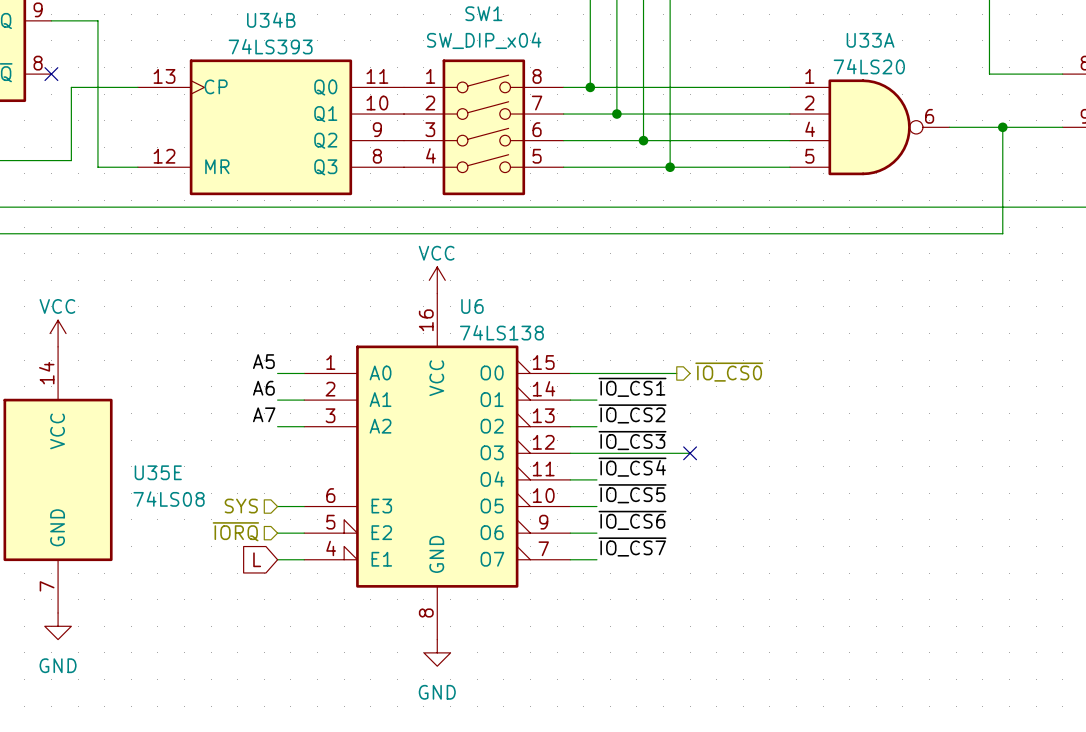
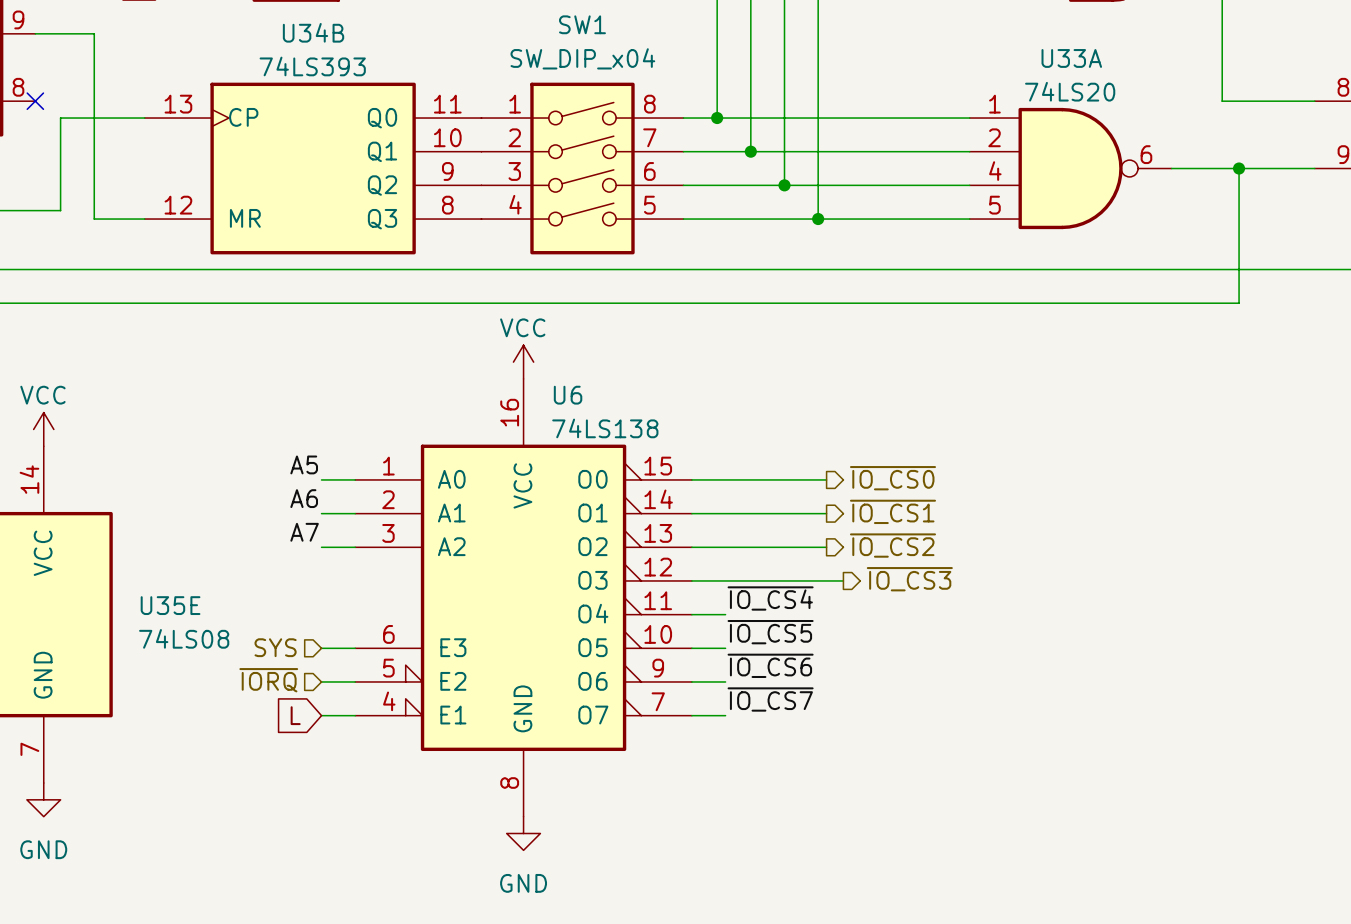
label: ~{IO_CS1} (632, 387) -> none
hierarchical label: none -> ~{IO_CS1} (892, 511)
wire: none -> (725, 513) (826, 513)
label: ~{IO_CS2} (632, 413) -> none
hierarchical label: none -> ~{IO_CS2} (892, 545)
wire: none -> (725, 547) (826, 547)
label: ~{IO_CS3} (632, 440) -> none
hierarchical label: none -> ~{IO_CS3} (909, 579)
no-connect mark: (690, 453) -> none

